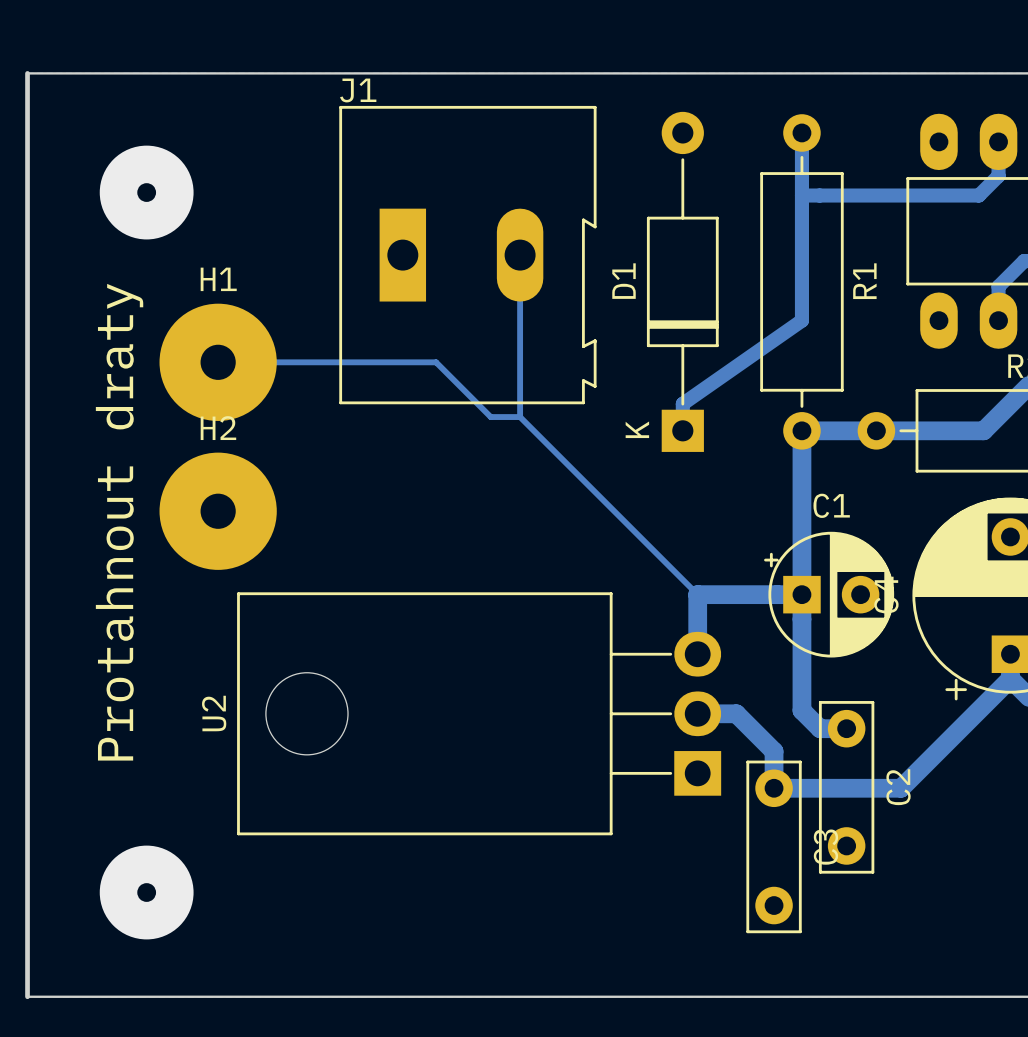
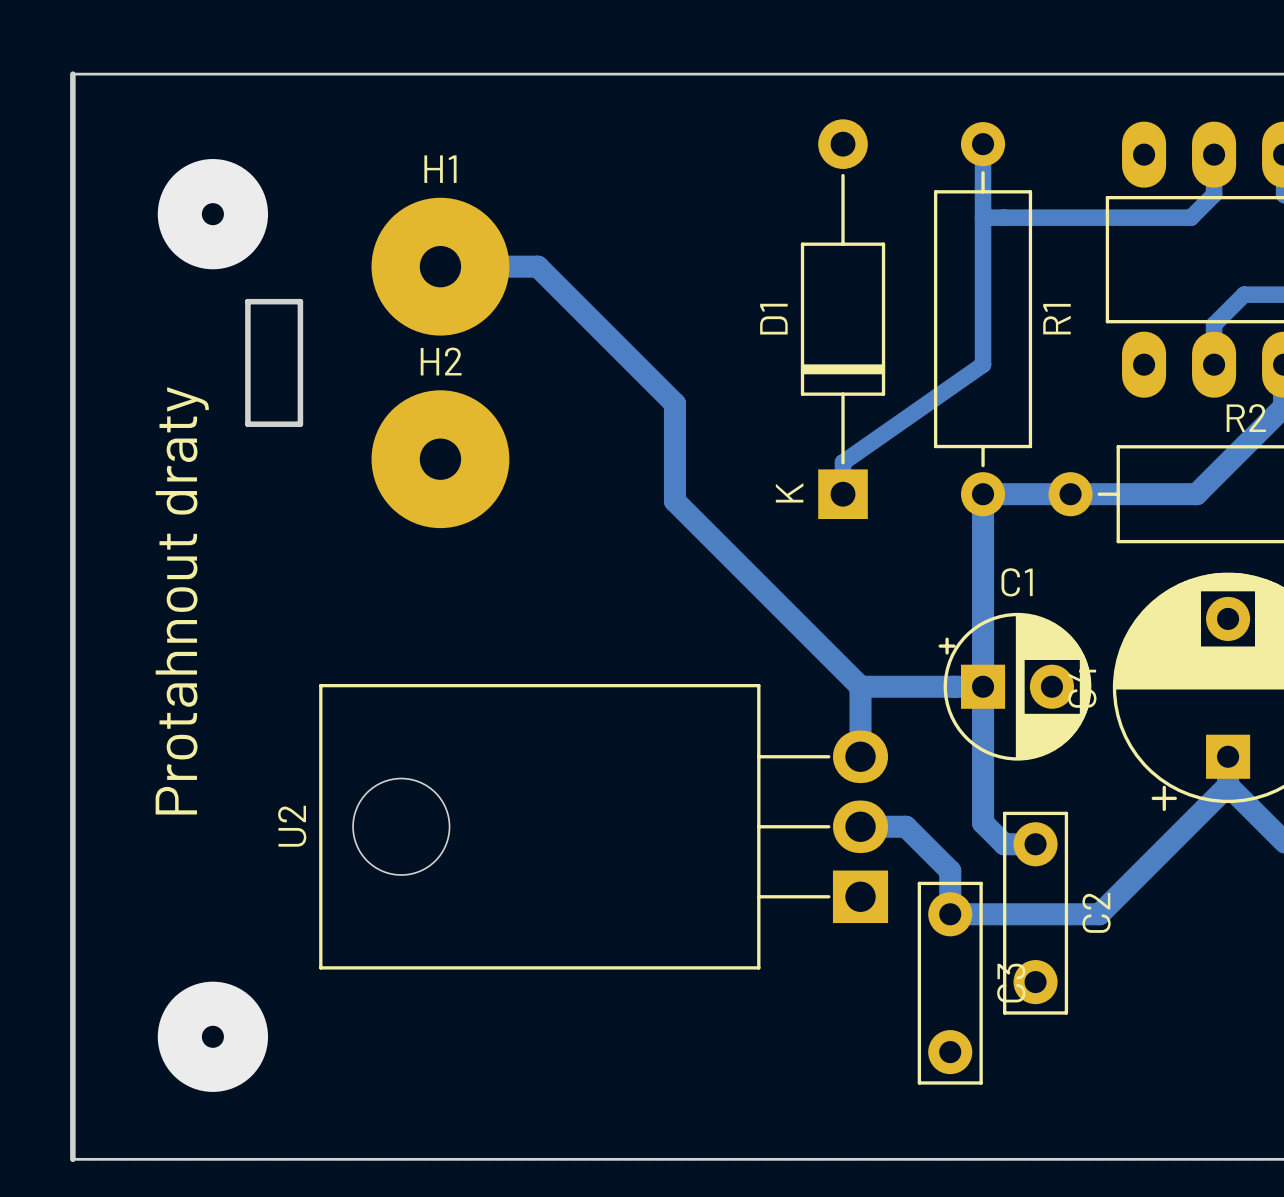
J1: (467, 255) -> none
bottom track: (520, 255) (520, 417) -> none
board edge: none -> (247, 301) (300, 301) (300, 424) (247, 424) (247, 301)
bottom track: (218, 362) (436, 362) (490, 417) (520, 417) -> none
H1 position: (218, 362) -> (440, 266)
bottom track: (520, 417) (539, 436) -> (440, 266) (537, 266) (674, 403) (674, 501)
bottom track width: thin (539, 436) (697, 594) -> thick (674, 501) (860, 686)
H2 position: (218, 511) -> (440, 459)

